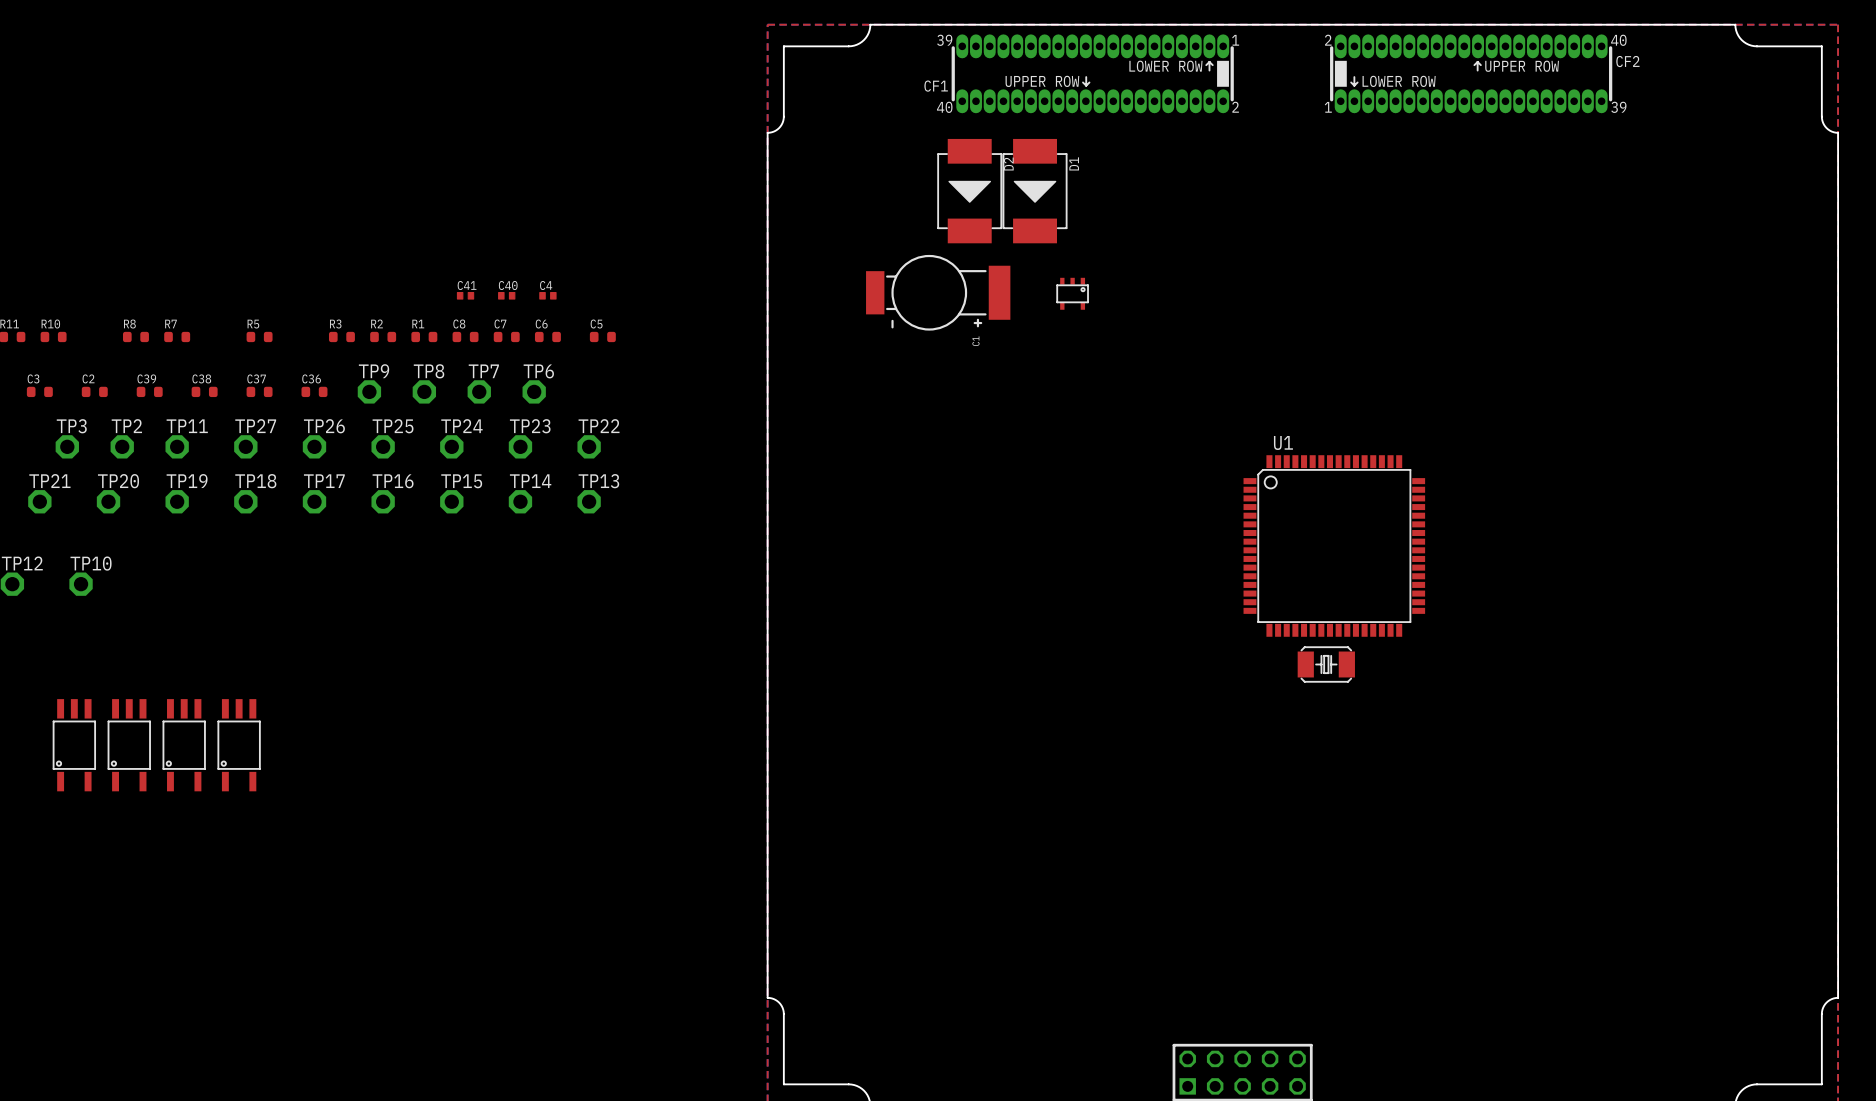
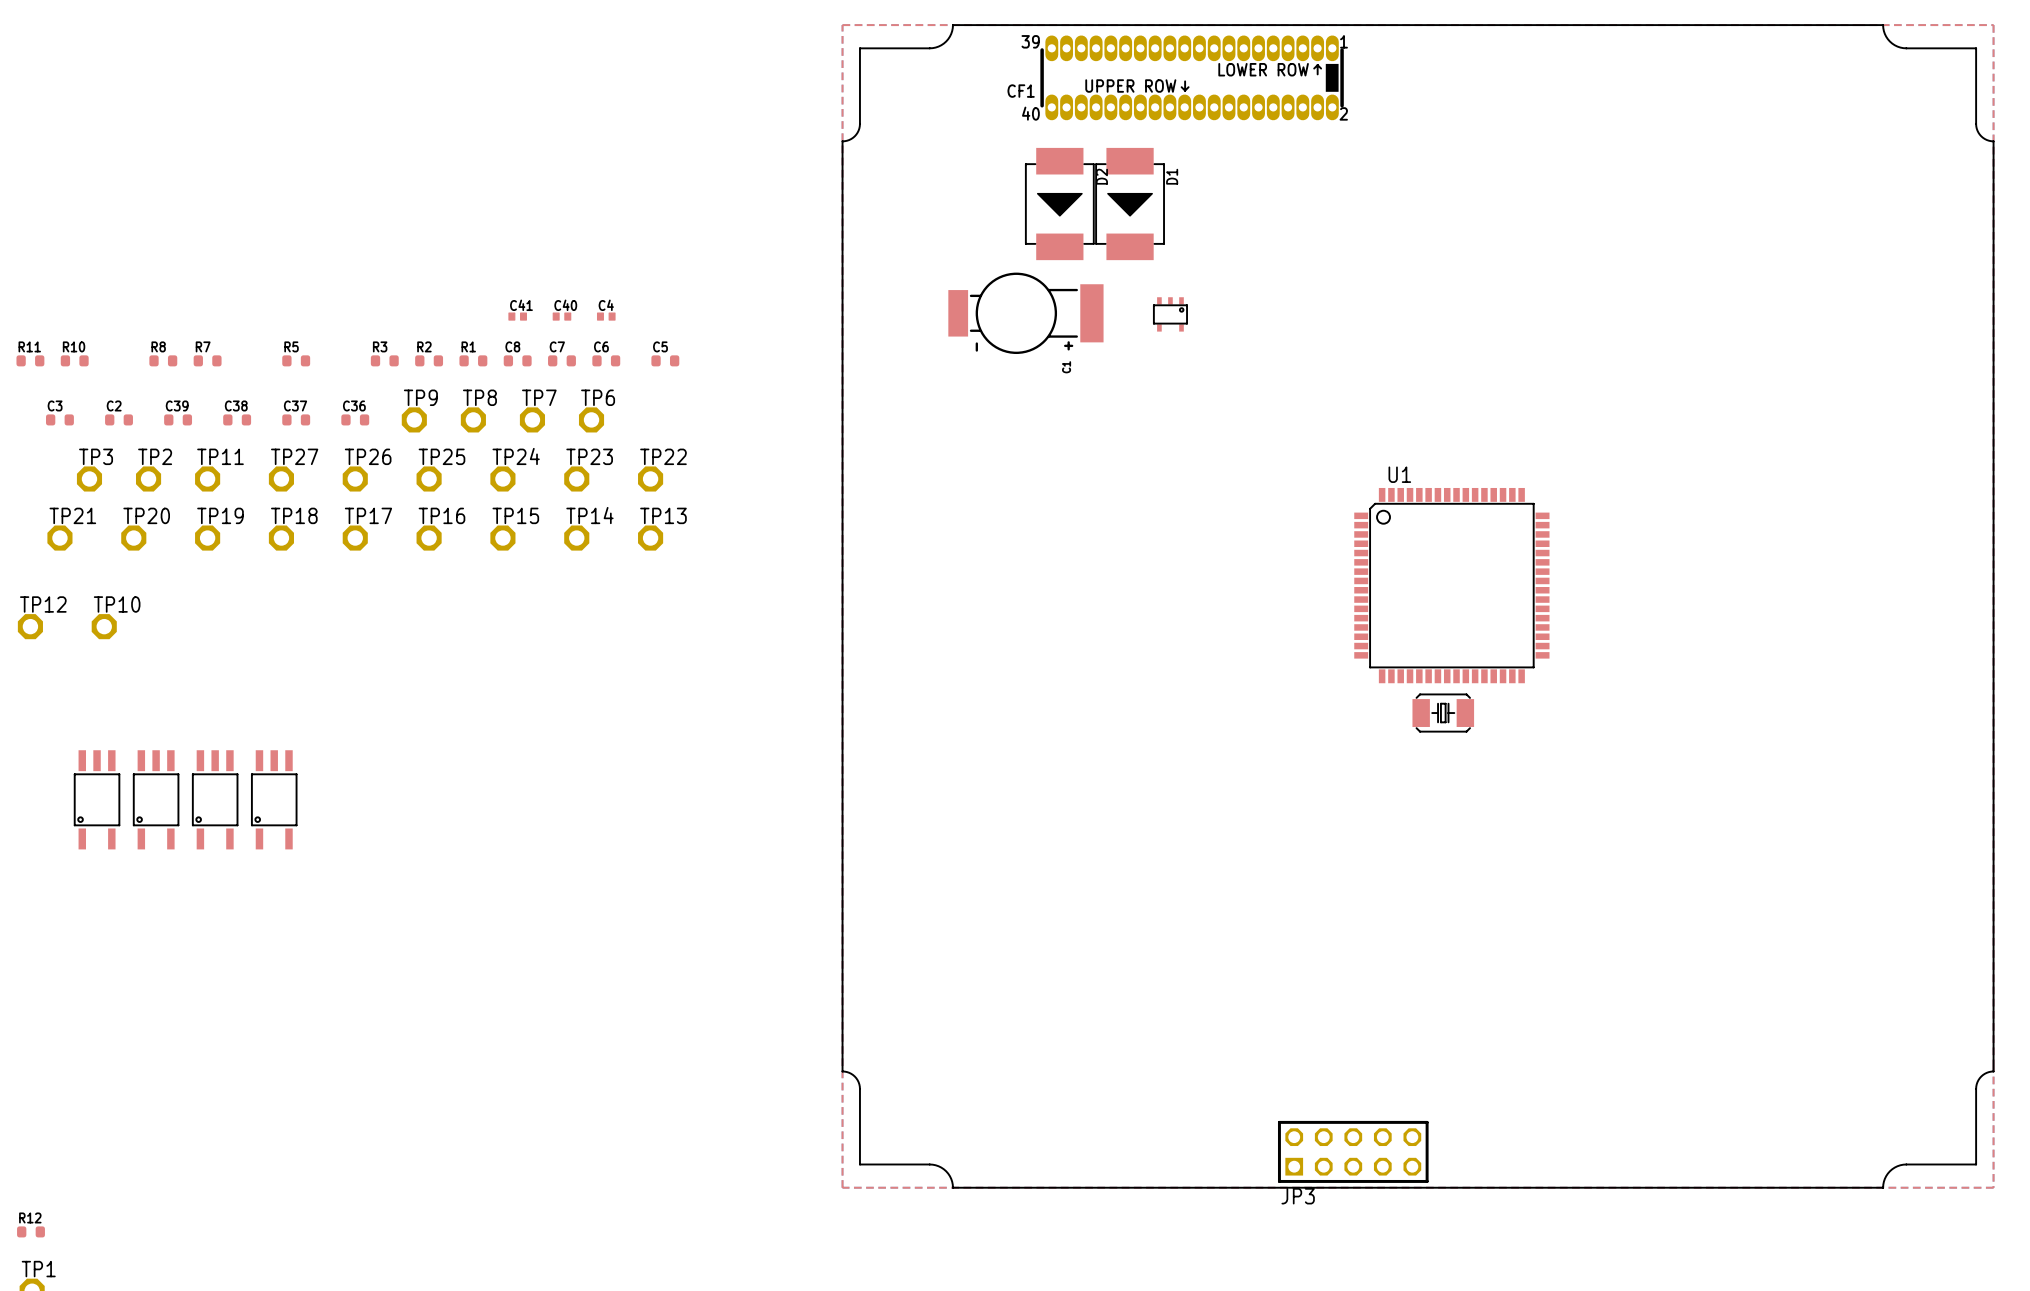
CF2: (1471, 73) -> none

